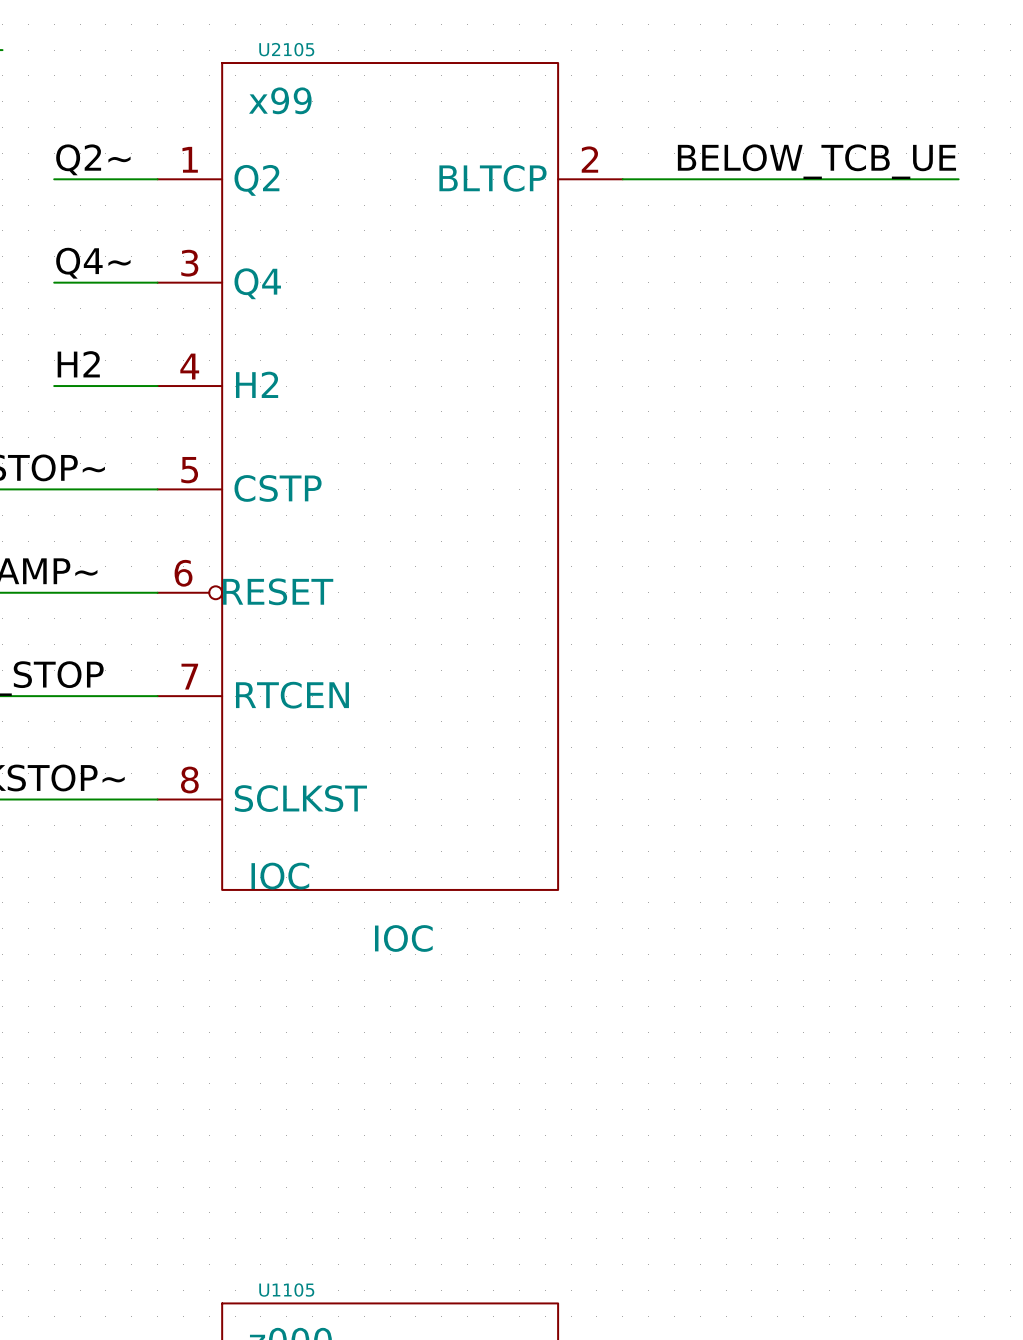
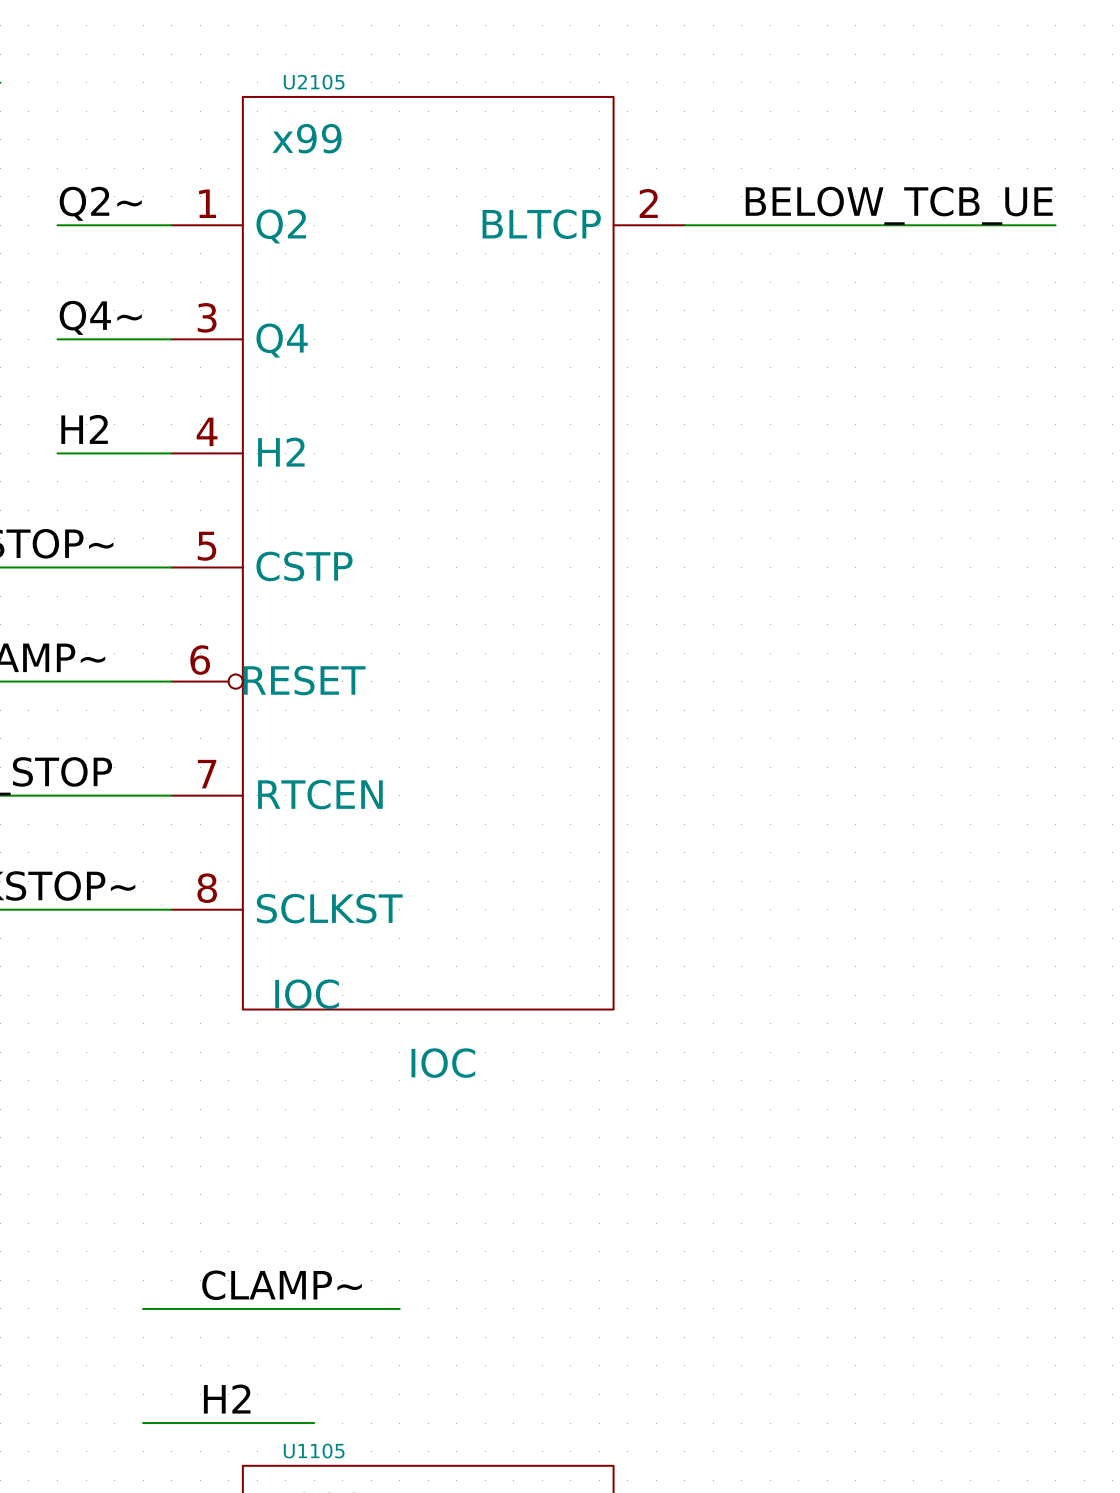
label: none -> CLAMP~ (282, 1285)
wire: none -> (143, 1308) (399, 1308)
label: none -> H2 (227, 1399)
wire: none -> (143, 1423) (314, 1423)

